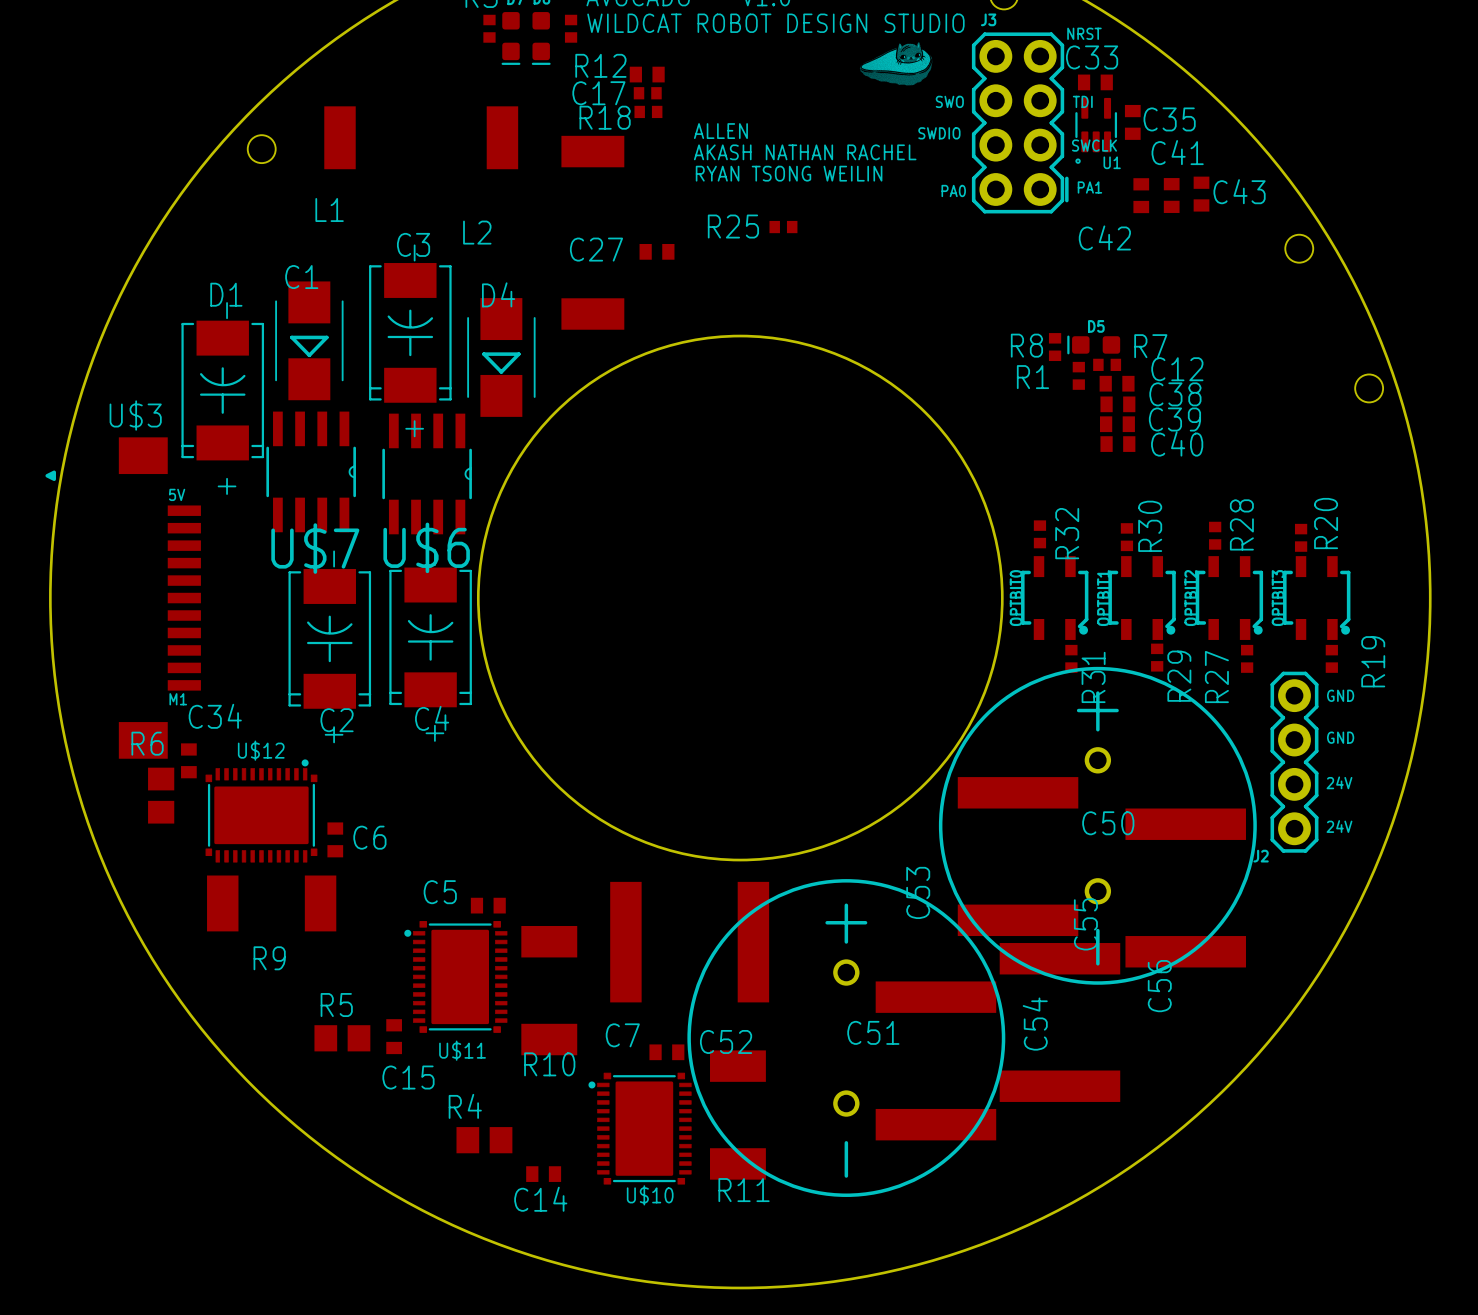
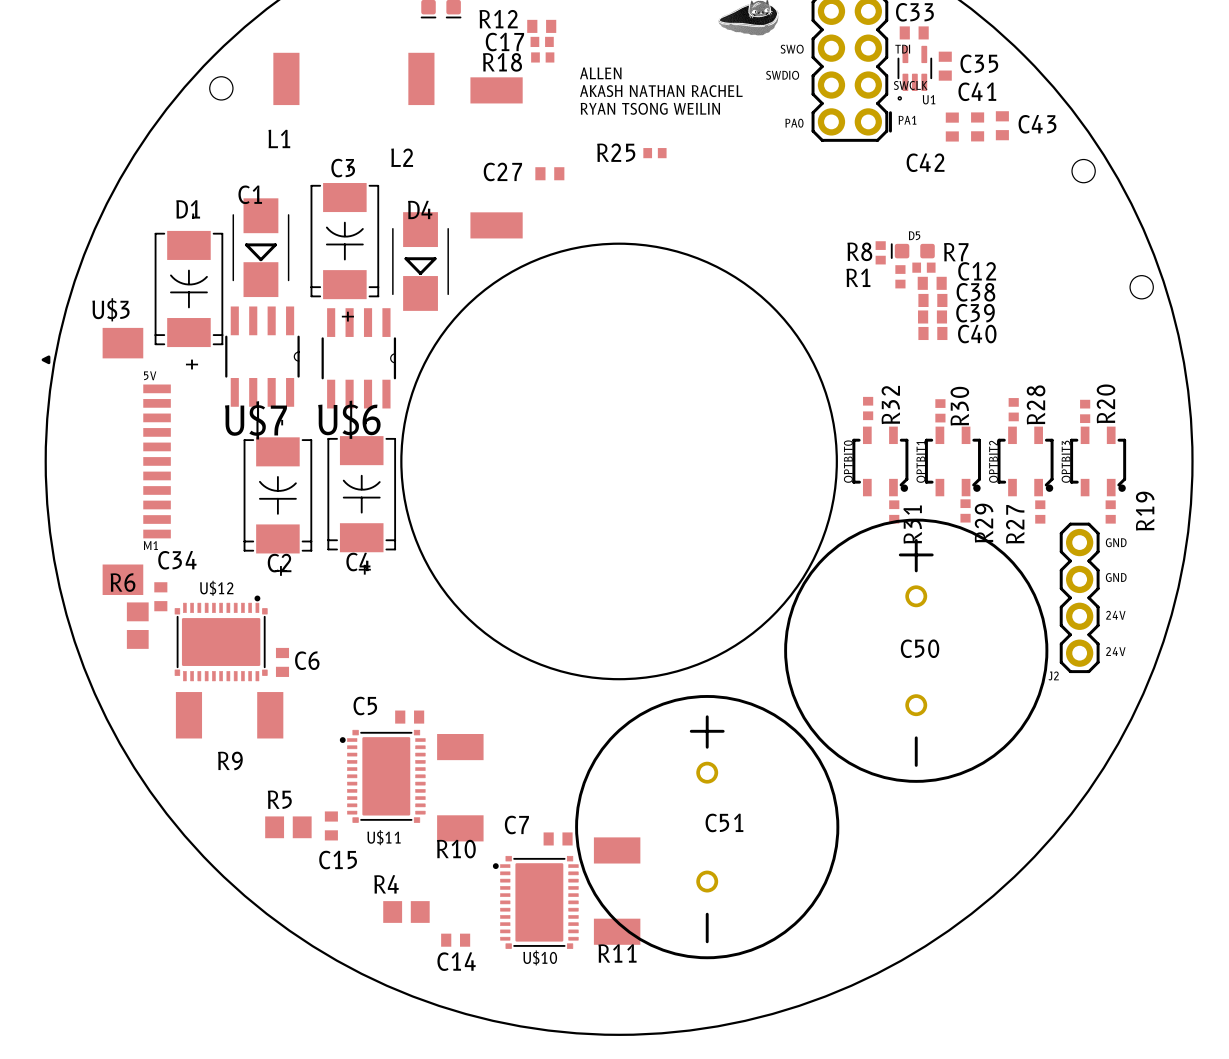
C53: (1018, 856) -> none
C55: (1185, 887) -> none
C52: (689, 942) -> none
C56: (1059, 1022) -> none
C54: (935, 1060) -> none

